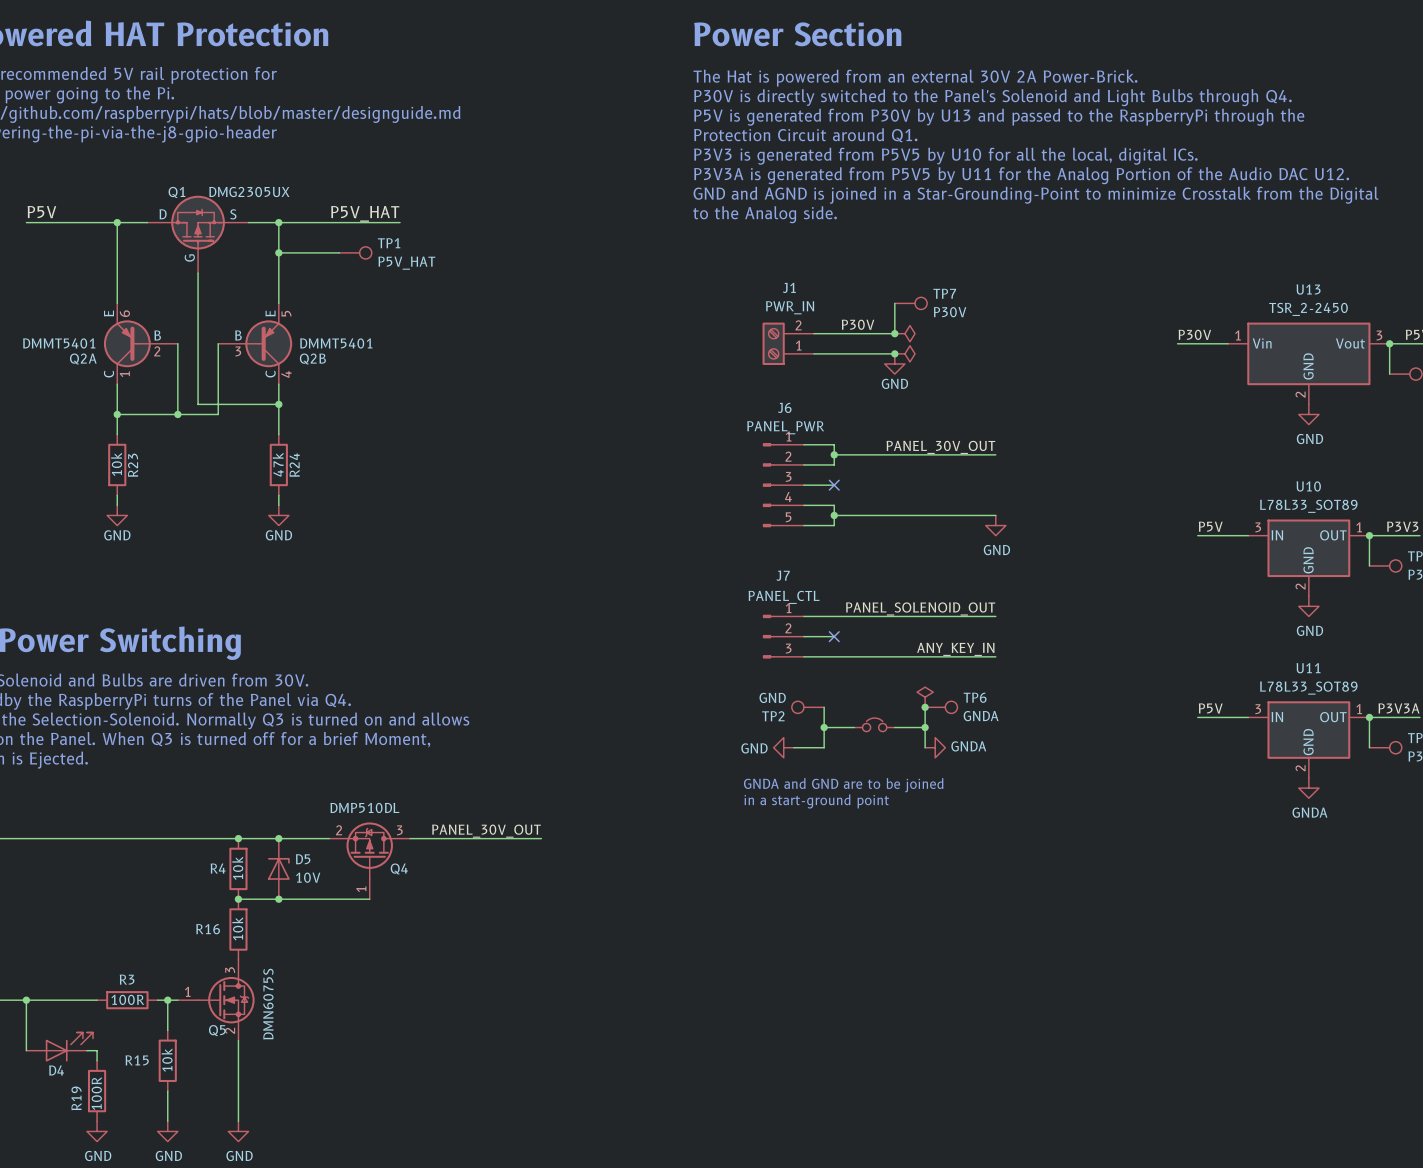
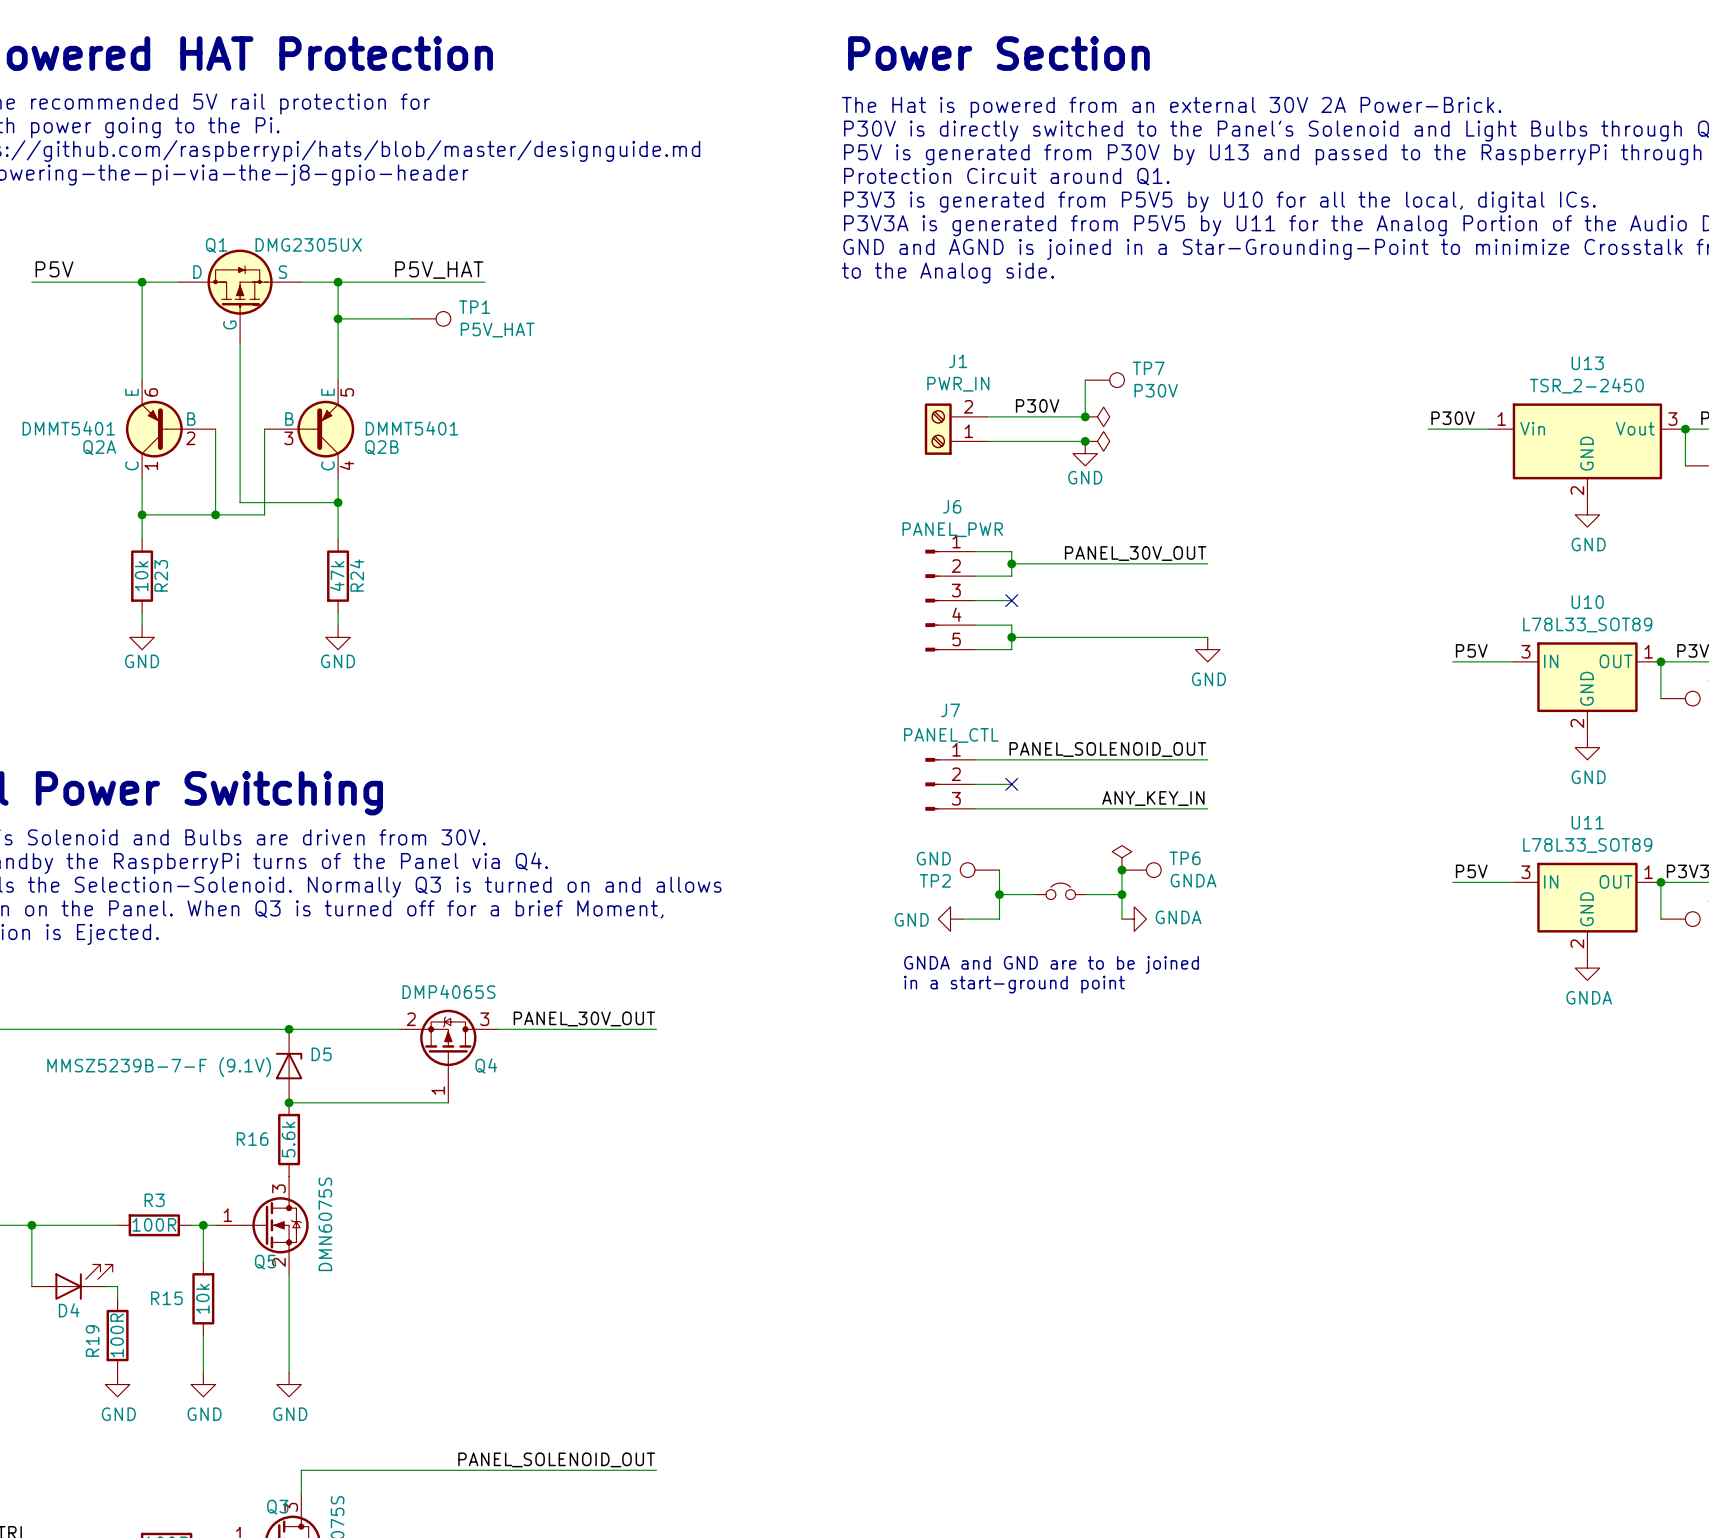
Q4 value: DMP510DL (364, 807) -> DMP4065S (448, 991)
junction: (278, 838) -> none
R4: 10k (238, 868) -> none
D5 position: (278, 868) -> (289, 1066)
D5 value: 10V (308, 877) -> MMSZ5239B-7-F (9.1V) (159, 1067)
junction: (278, 899) -> none
R16 value: 10k (237, 928) -> 5.6k (288, 1139)

